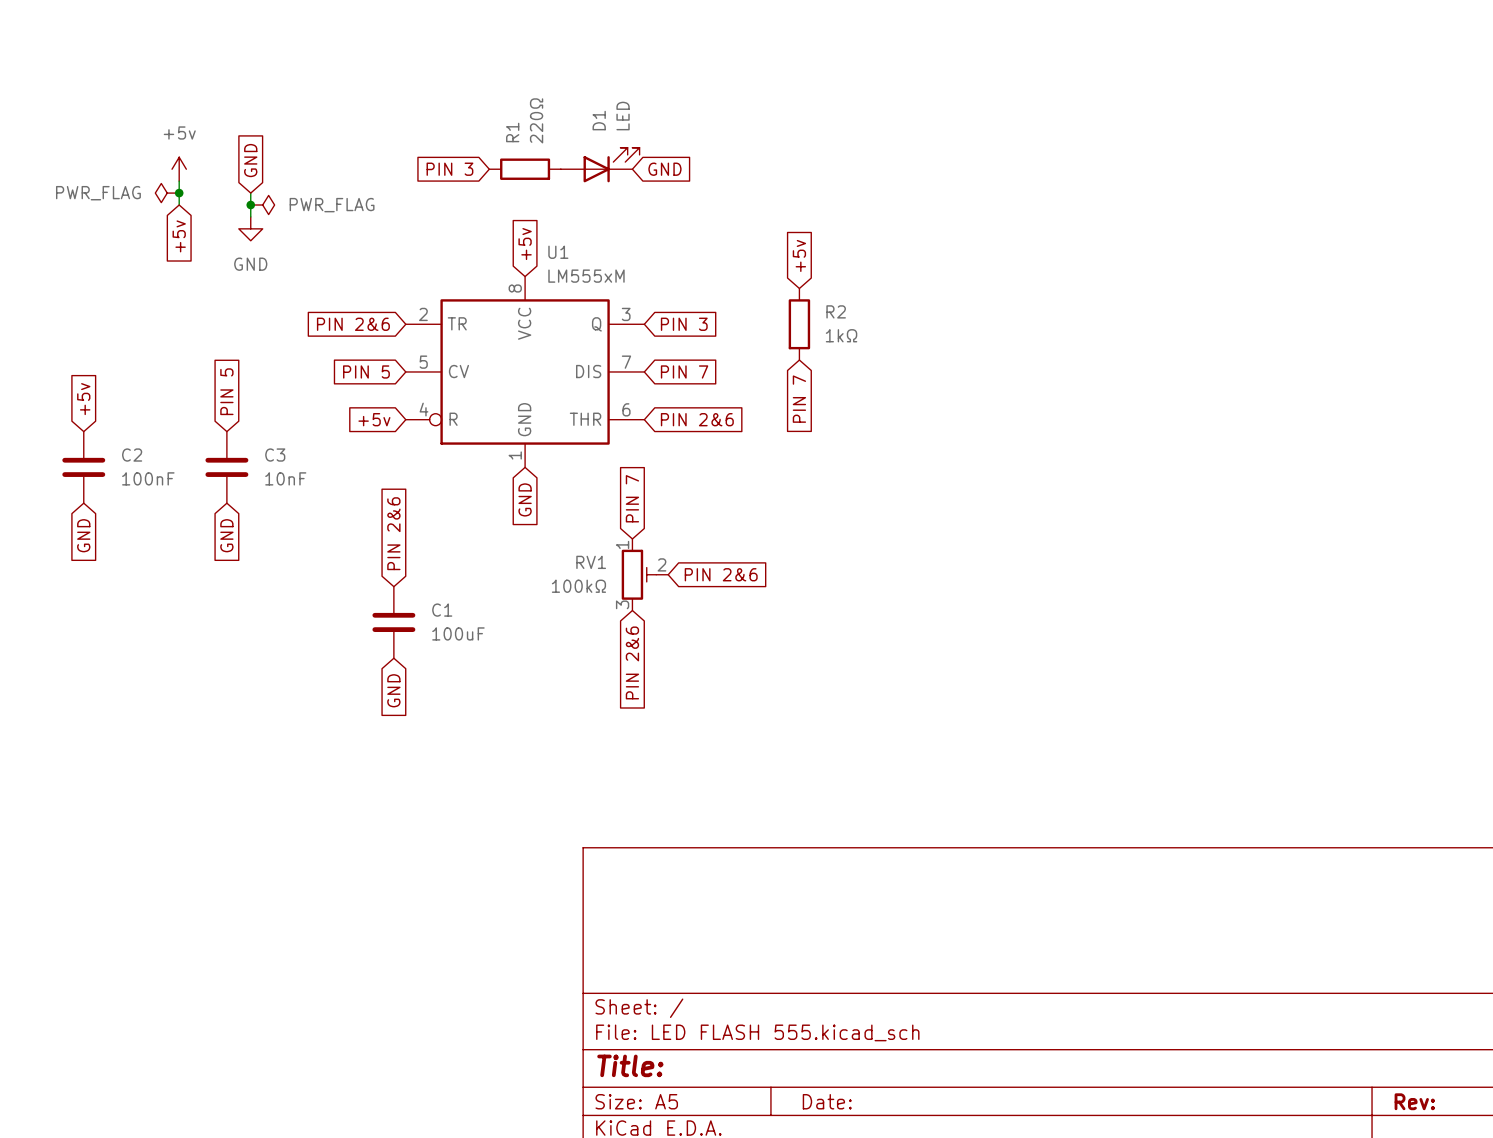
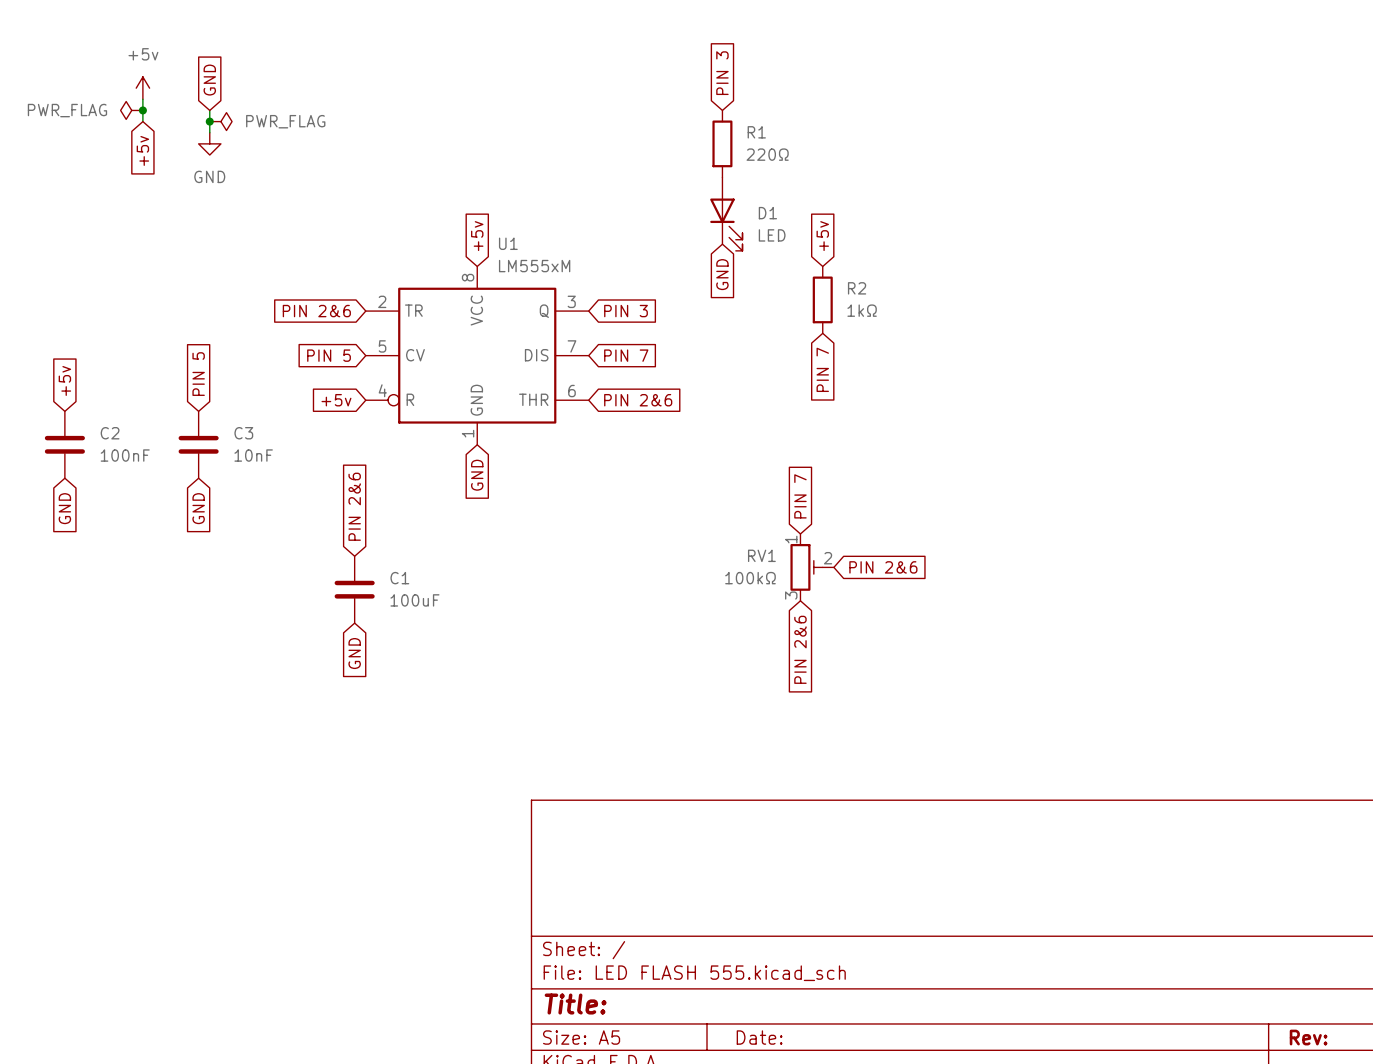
global label: none -> PIN 3 (722, 73)
power symbol: none -> PWR_FLAG (131, 110)
junction: none -> (142, 110)
junction: none -> (209, 121)
power symbol: none -> PWR_FLAG (220, 121)
global label position: GND (250, 160) -> GND (209, 80)
D1 position: (600, 165) -> (726, 214)
D1 rotation: 0° (611, 165) -> 90° clockwise (726, 224)
power symbol position: +5v (179, 169) -> +5v (142, 88)
global label: PIN 3 (449, 169) -> none
R1 rotation: 0° (525, 169) -> 90° clockwise (722, 143)
R1 position: (525, 169) -> (722, 143)
global label rotation: 0° (664, 169) -> 90° clockwise (722, 274)
global label position: GND (664, 169) -> GND (722, 274)
wire: (179, 181) (179, 205) -> (142, 99) (142, 121)
power symbol: PWR_FLAG (167, 193) -> none
junction: (179, 193) -> none
wire: (250, 193) (250, 216) -> (209, 110) (209, 132)
junction: (250, 205) -> none
power symbol: PWR_FLAG (262, 205) -> none
power symbol position: GND (250, 228) -> GND (209, 143)
global label position: +5v (179, 236) -> +5v (142, 150)
global label position: +5v (799, 255) -> +5v (822, 236)
R2 position: (799, 324) -> (822, 299)
global label position: PIN 7 (799, 399) -> PIN 7 (822, 369)
global label: PIN 7 (632, 498) -> none
global label: none -> PIN 7 (800, 496)
RV1 position: (644, 574) -> (812, 567)
global label: PIN 2&6 (721, 574) -> none
global label: none -> PIN 2&6 (883, 567)
global label: PIN 2&6 (632, 662) -> none
global label: none -> PIN 2&6 (800, 649)

